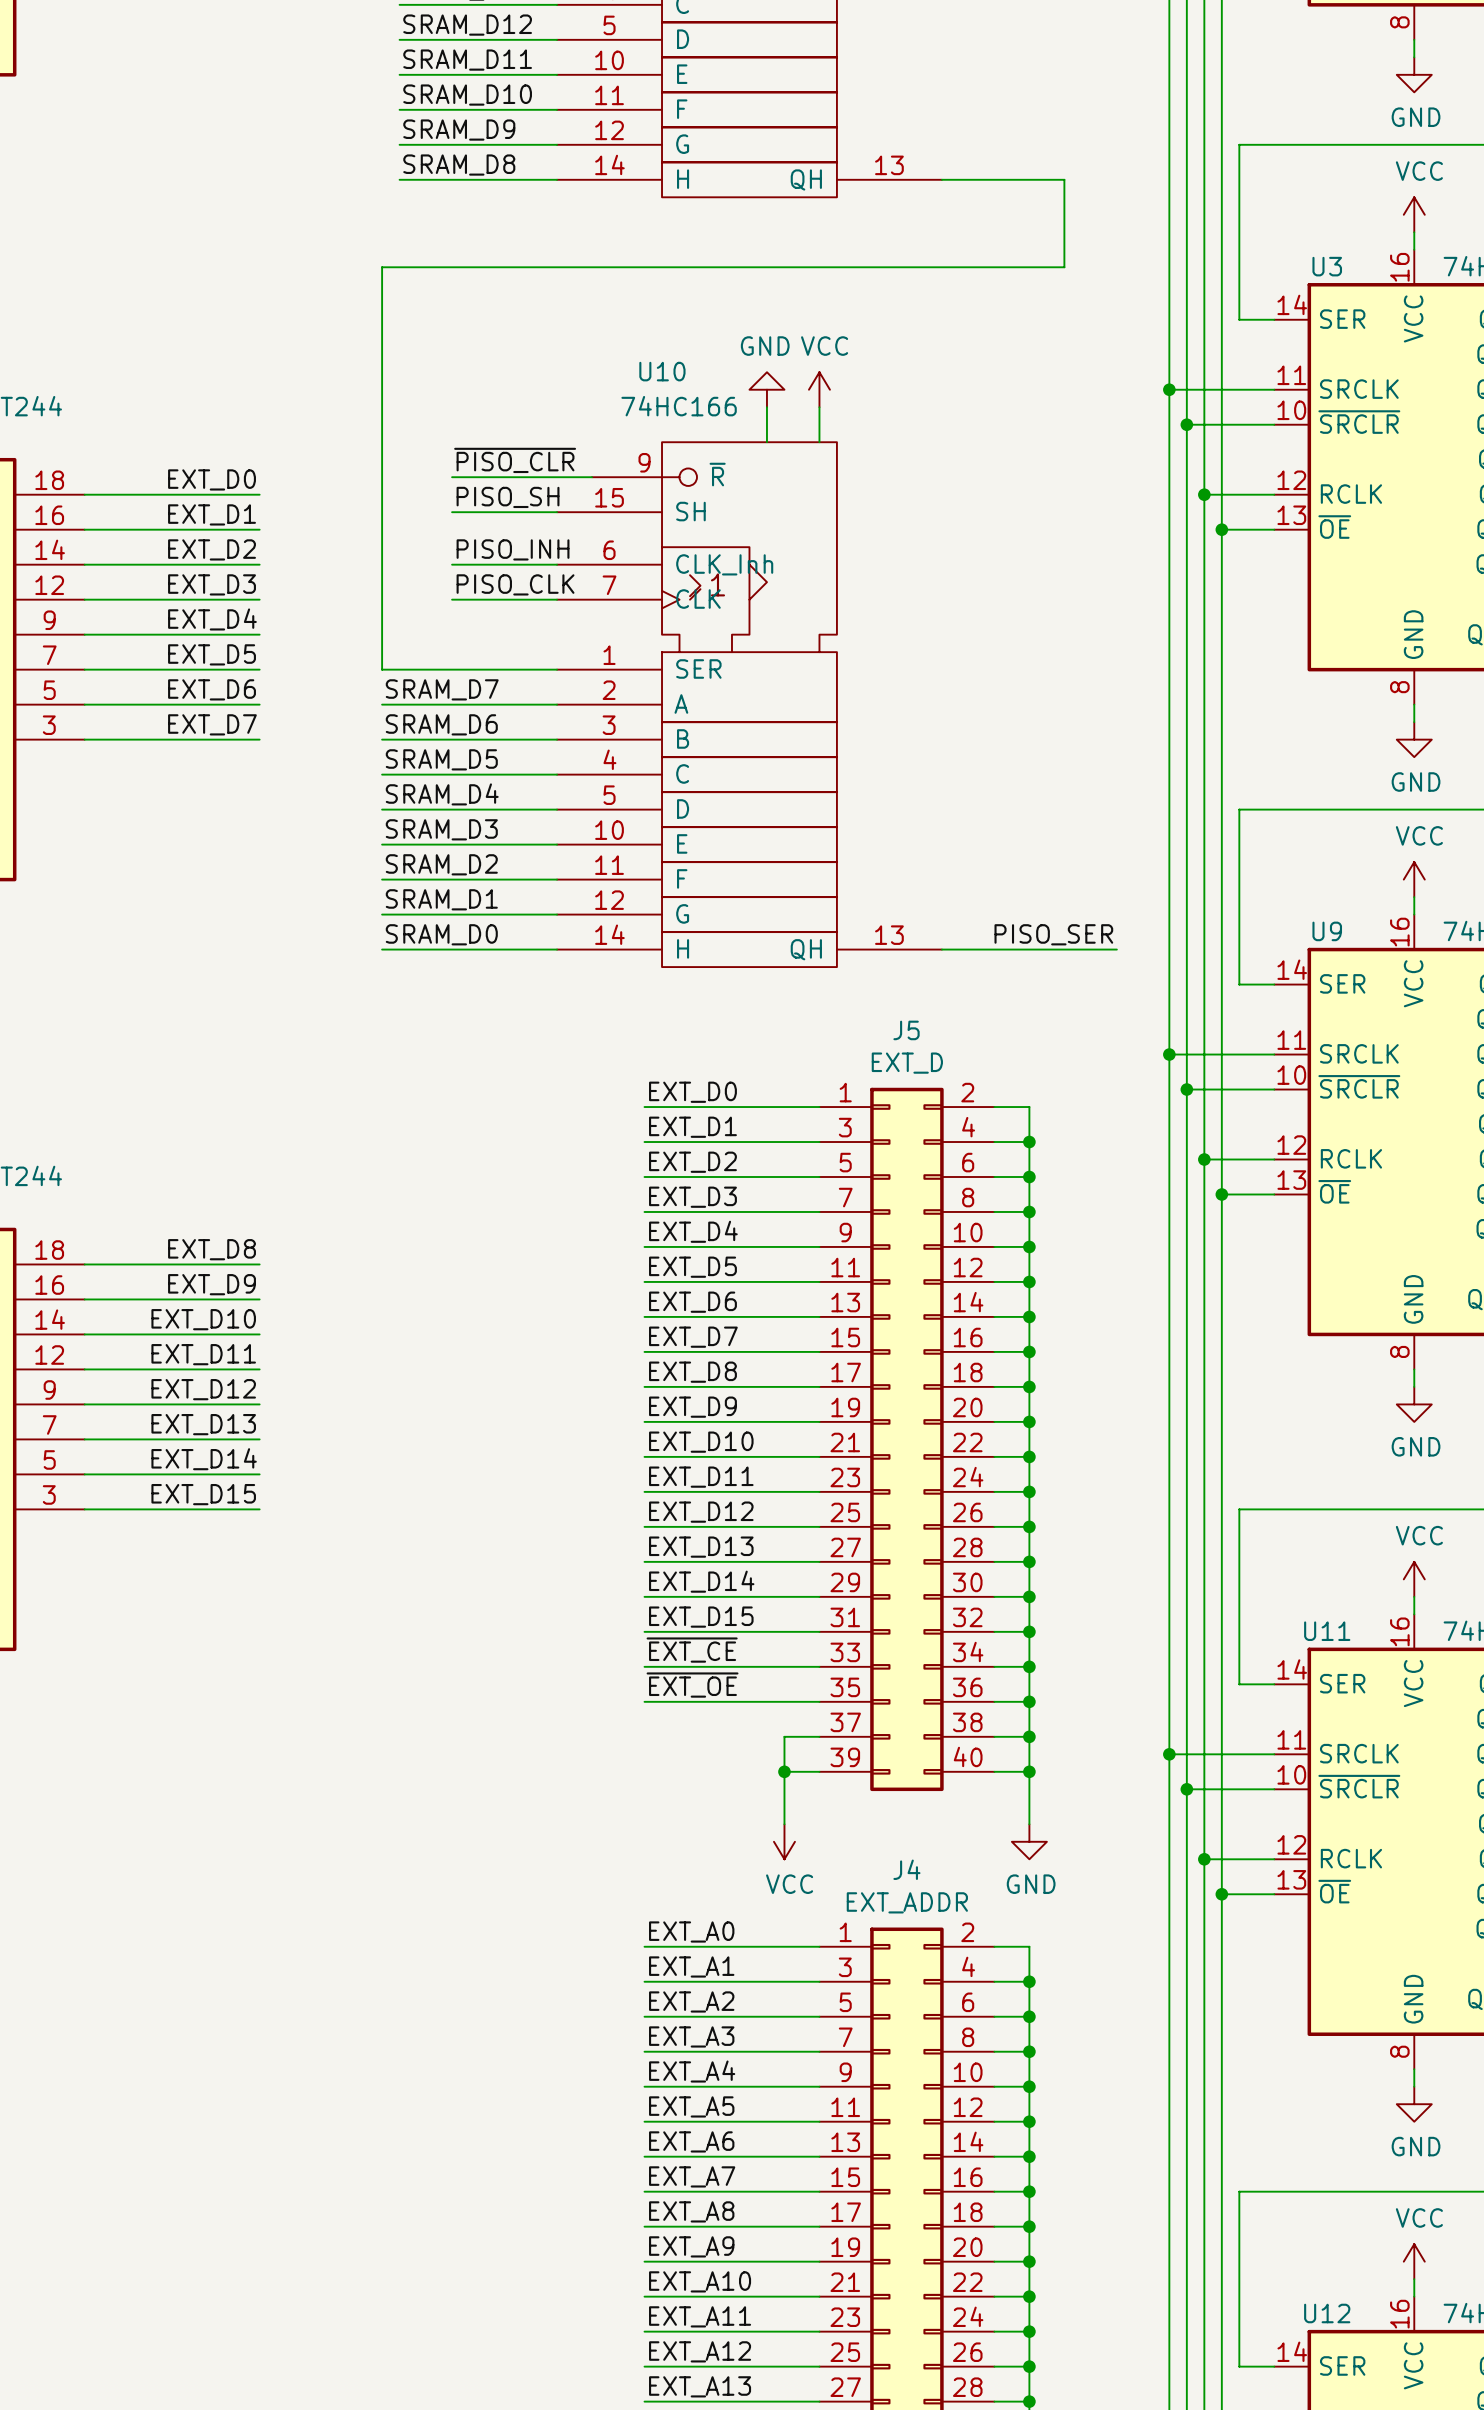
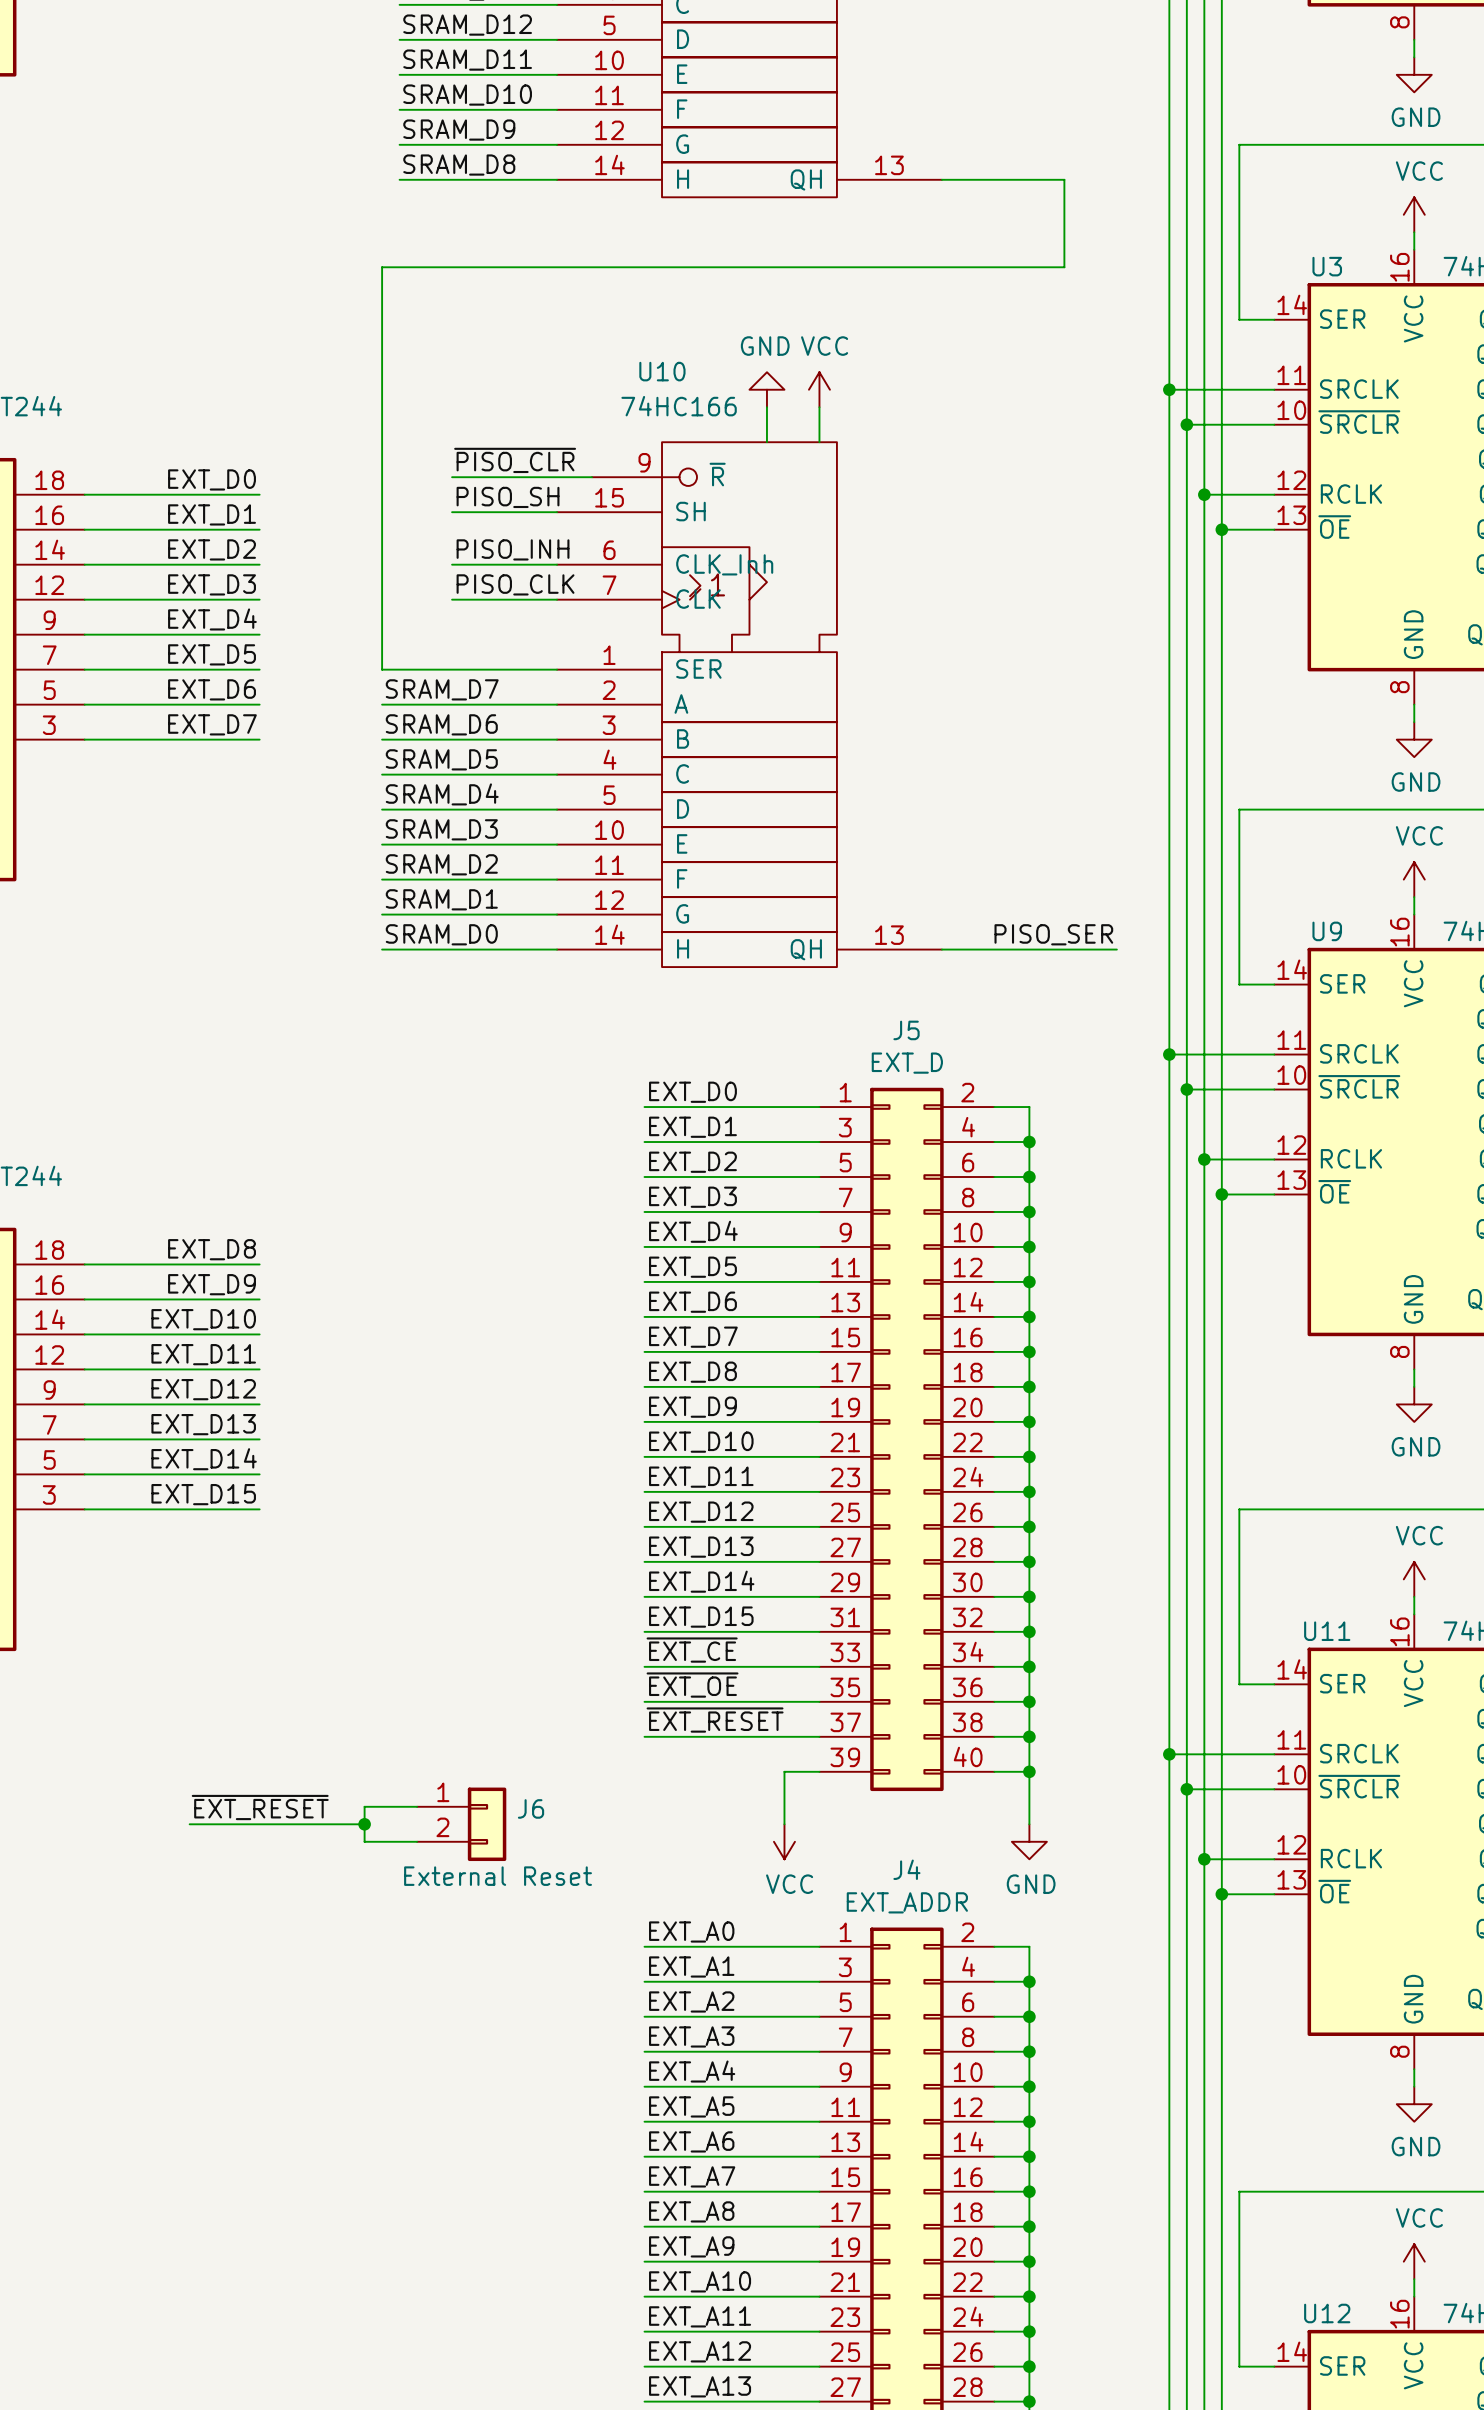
label: none -> ~{EXT_RESET} (715, 1720)
wire: (784, 1736) (784, 1771) -> (784, 1736) (644, 1736)
junction: (784, 1771) -> none
wire: none -> (417, 1806) (364, 1806) (364, 1841) (417, 1841)
label: none -> ~{EXT_RESET} (260, 1807)
wire: none -> (189, 1824) (364, 1824)
junction: none -> (364, 1824)
J6: none -> External Reset (461, 1824)

